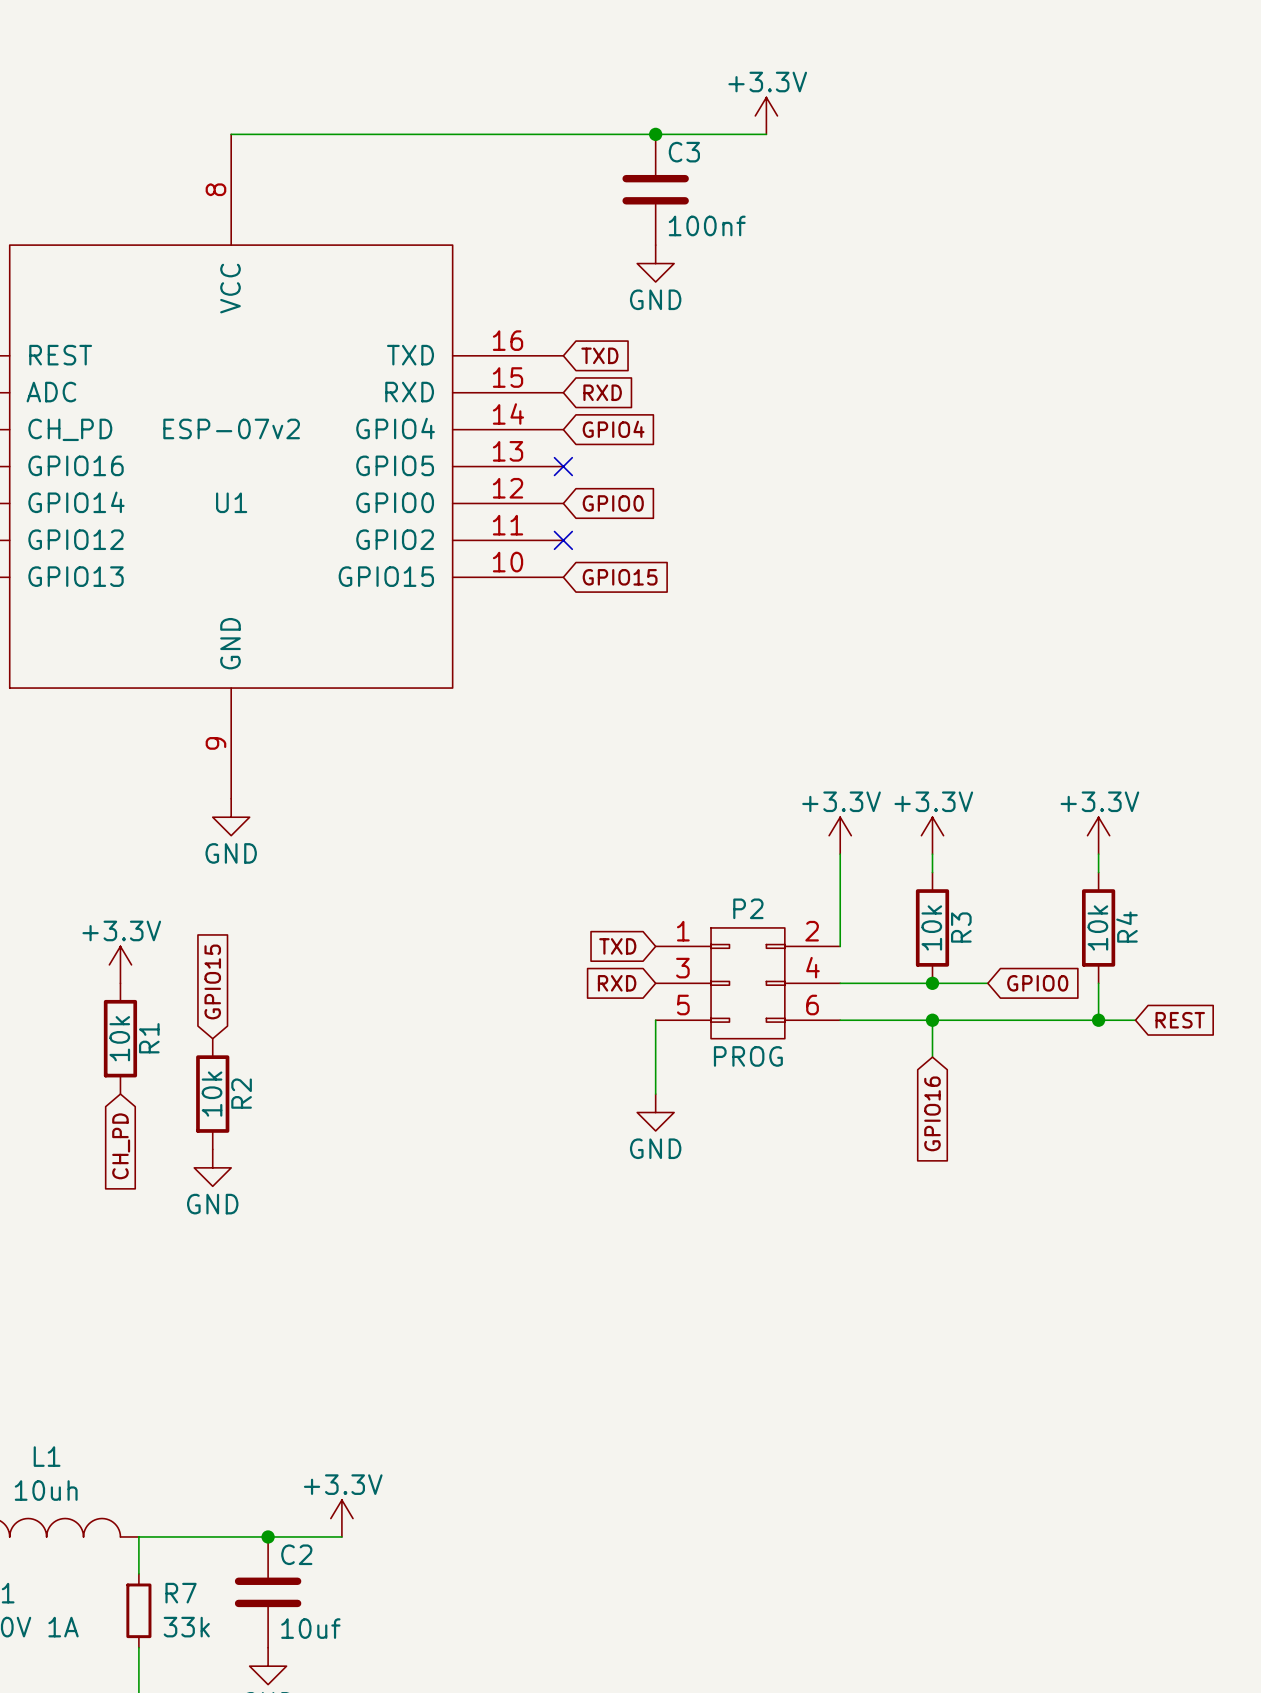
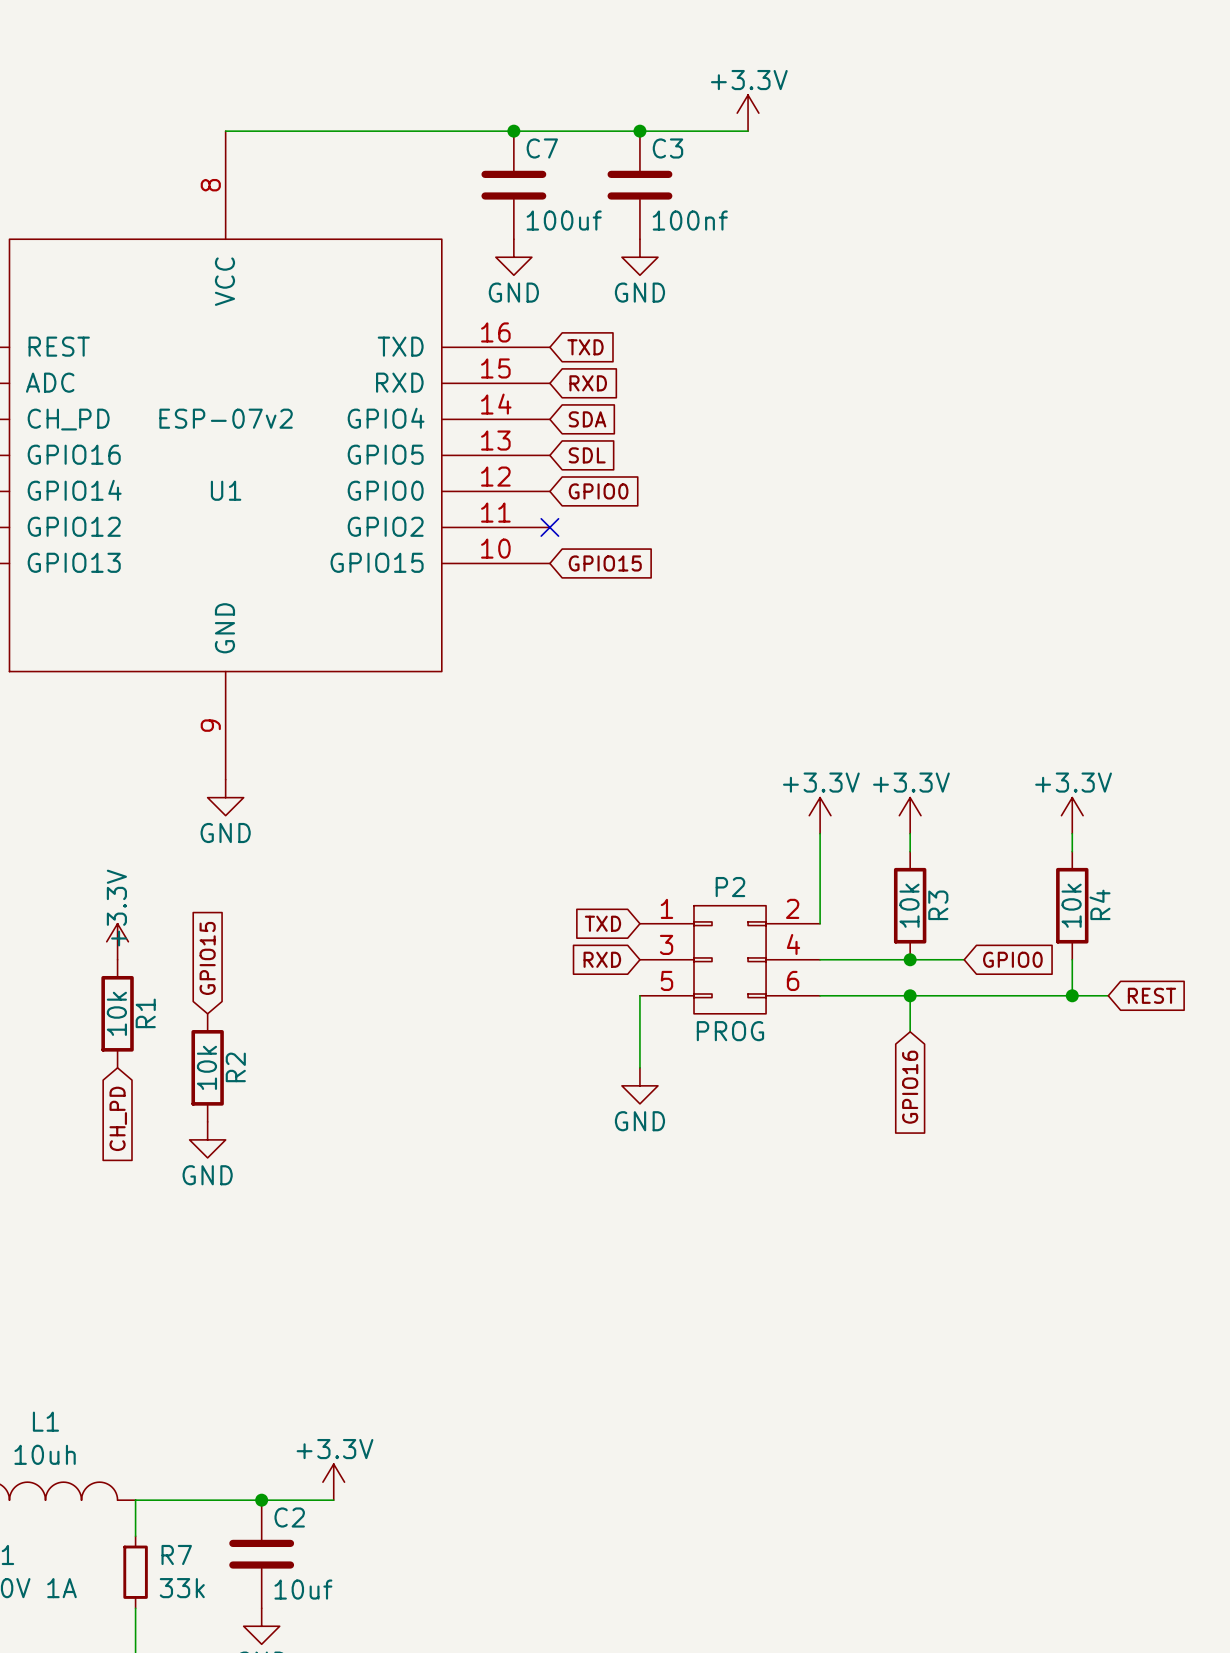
junction: none -> (513, 131)
C7: none -> 100uf (513, 185)
power symbol: none -> GND (513, 257)
global label: GPIO4 (613, 429) -> SDA (587, 419)
no-connect mark: (563, 466) -> none
global label: none -> SDL (587, 455)
power symbol text rotation: 0° (121, 930) -> 90° counterclockwise (116, 908)

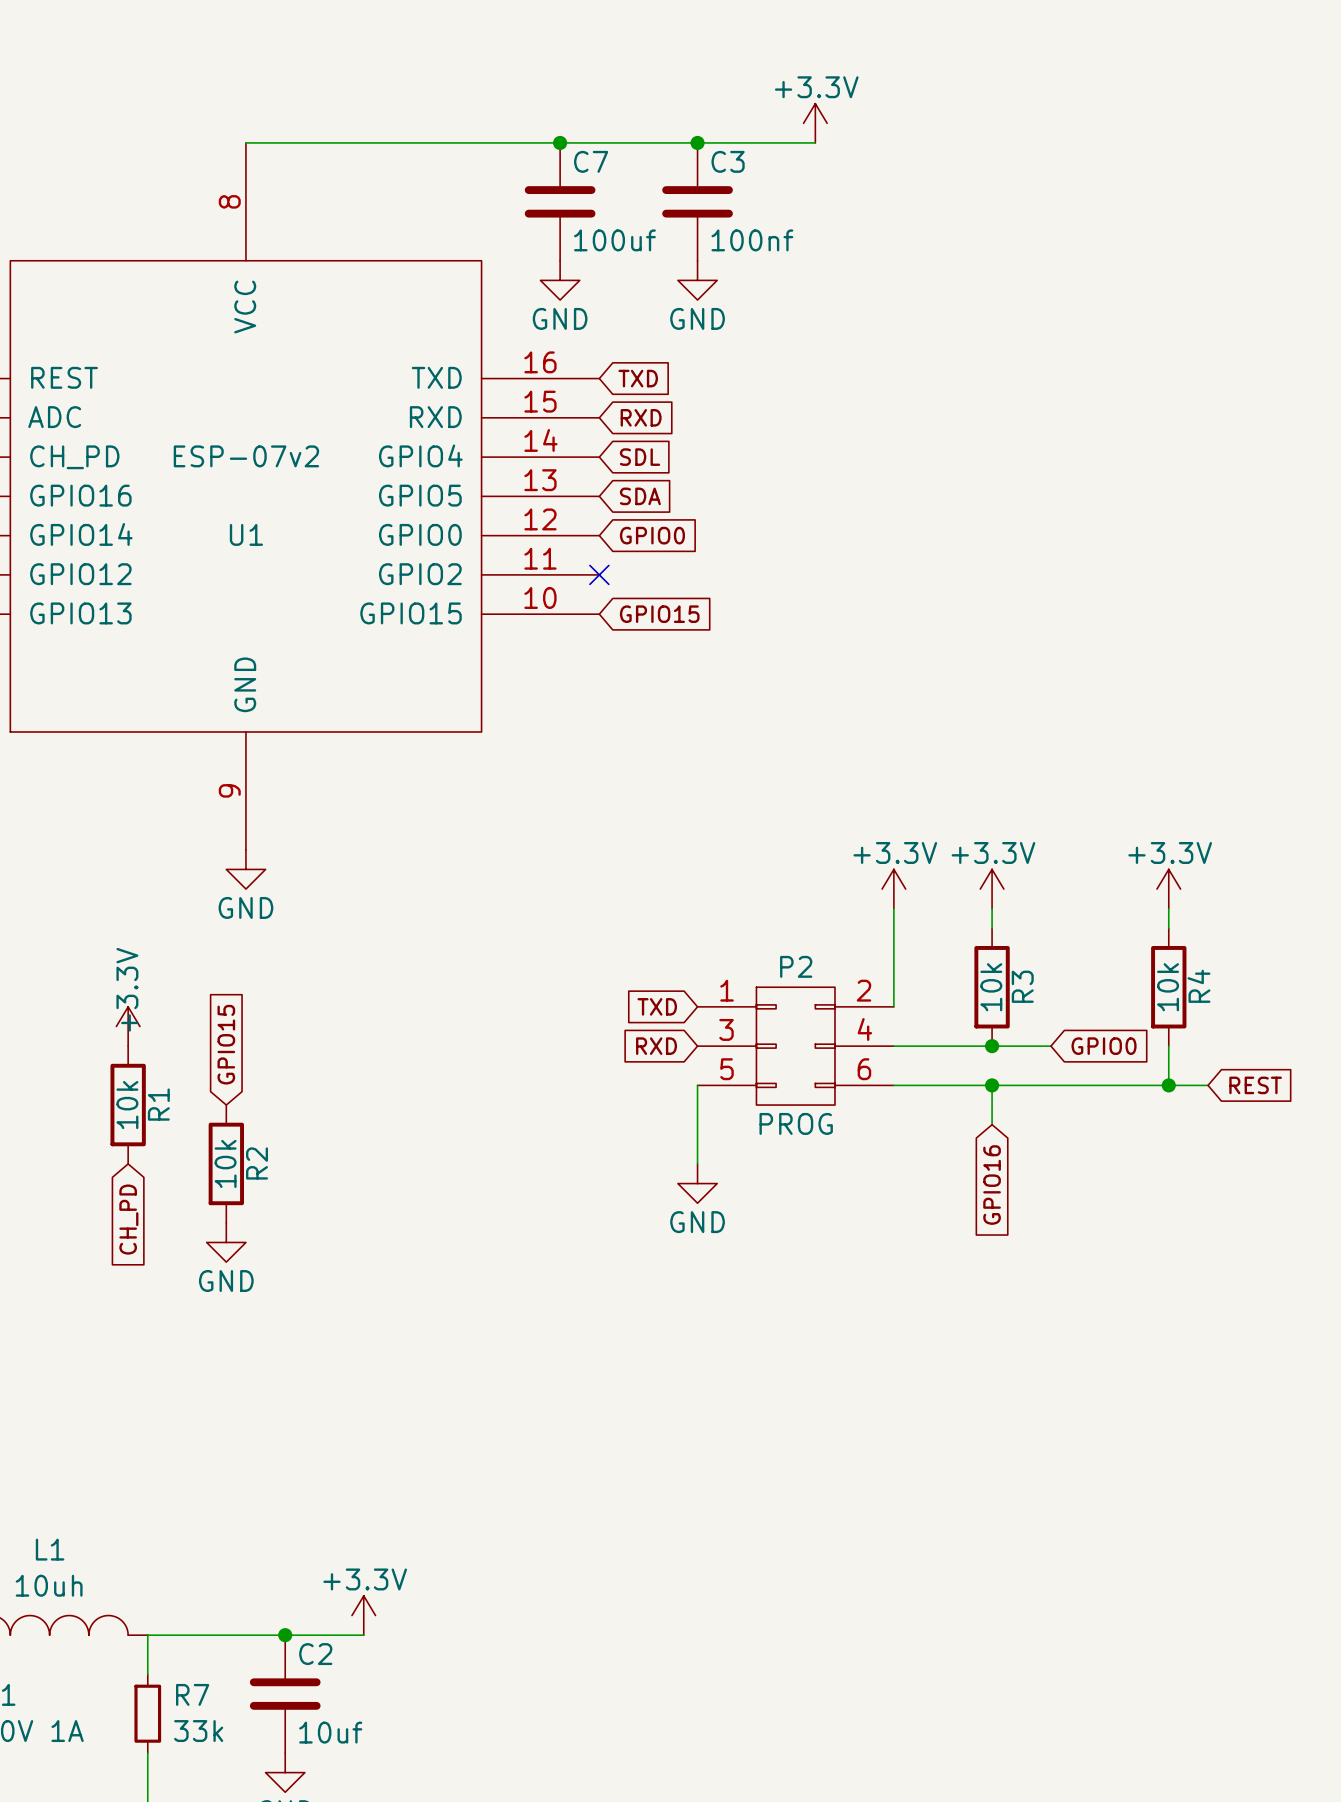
global label: SDA (587, 419) -> SDL (640, 457)
global label: SDL (587, 455) -> SDA (640, 496)

